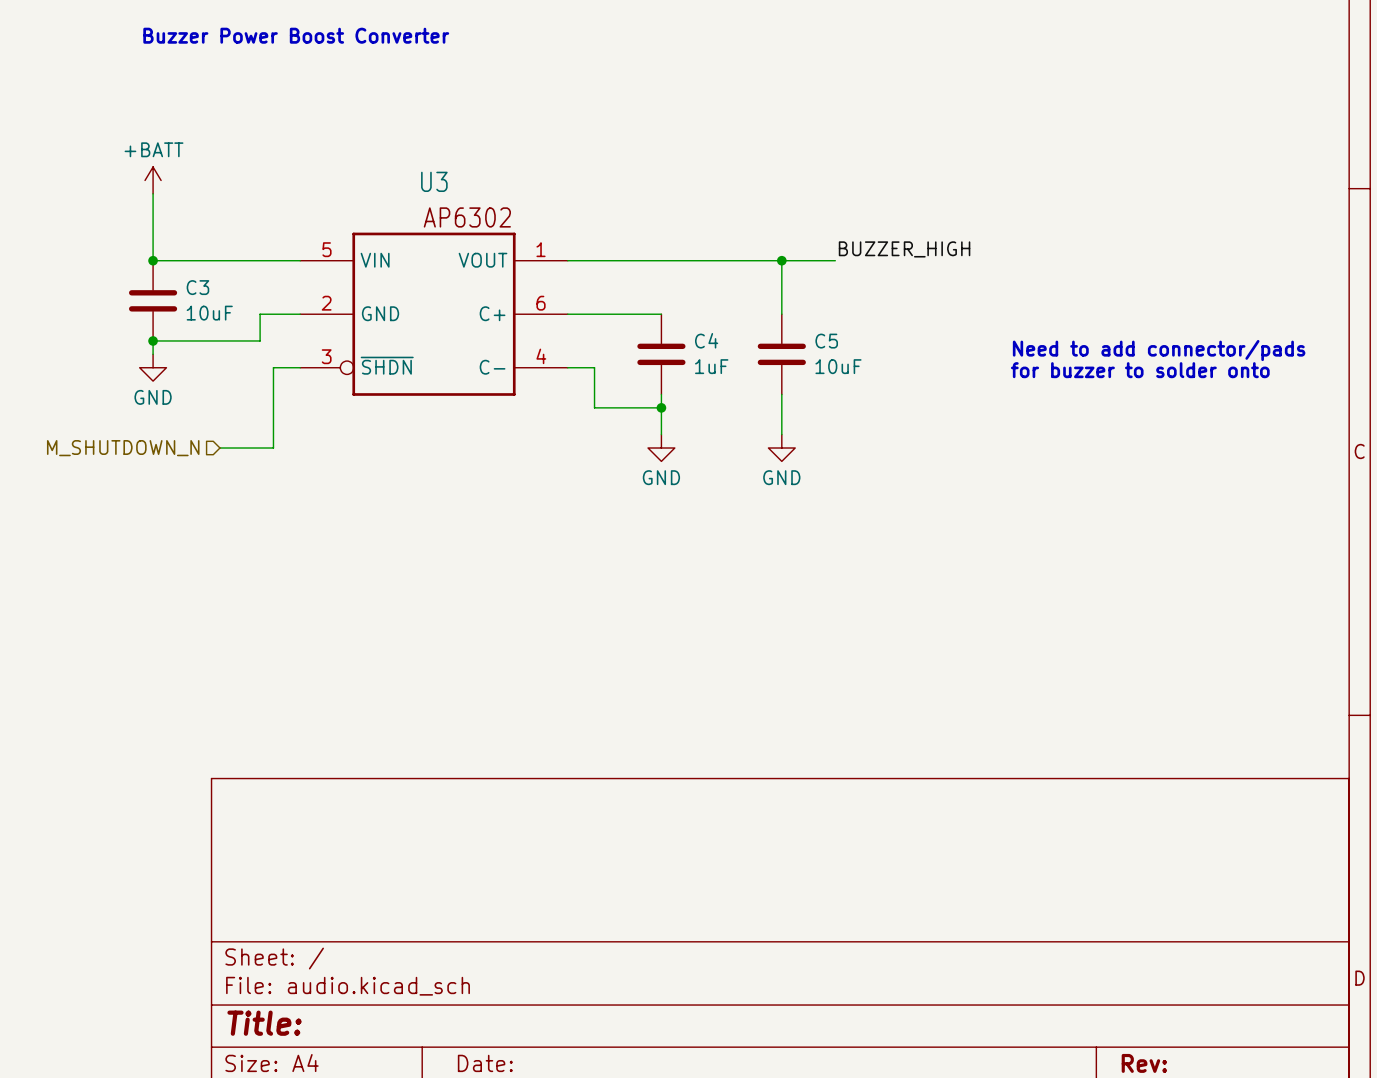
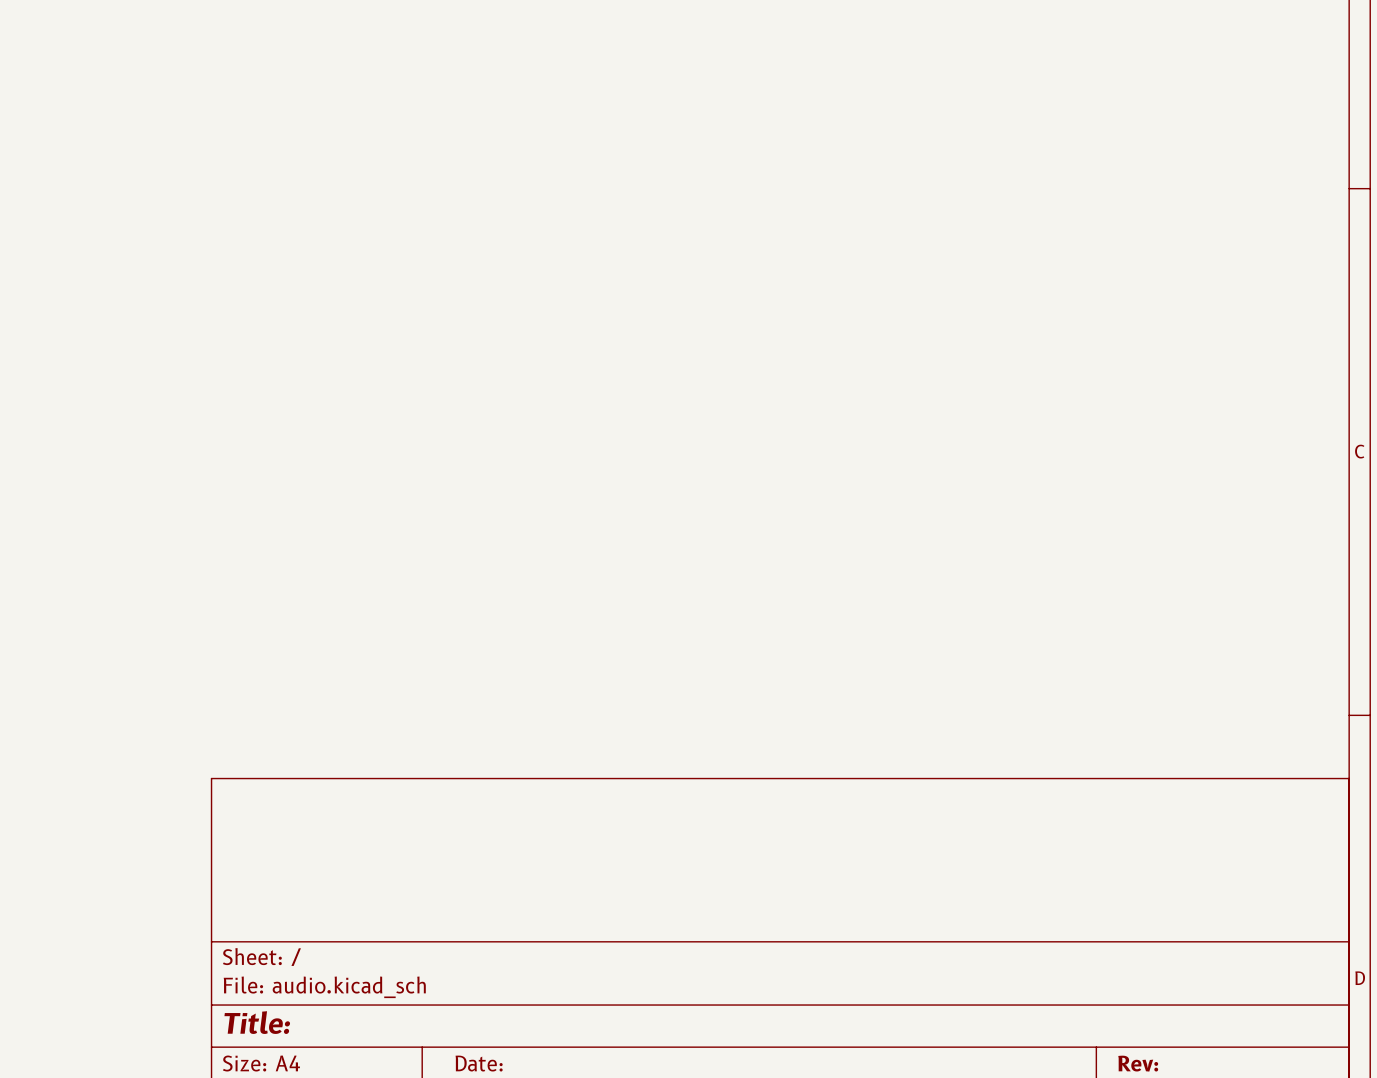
text: Buzzer Power Boost Converter (296, 35) -> none
power symbol: +BATT (153, 180) -> none
wire: (153, 193) (153, 260) (300, 260) -> none
label: BUZZER_HIGH (904, 249) -> none
junction: (153, 260) -> none
wire: (567, 260) (835, 260) -> none
wire: (781, 260) (781, 314) -> none
junction: (781, 260) -> none
C3: 10uF (153, 300) -> none
wire: (300, 314) (260, 314) (260, 340) (153, 340) (153, 354) -> none
U3: (434, 314) -> none
wire: (567, 314) (661, 314) -> none
junction: (153, 340) -> none
text: Need to add connector/pads (1159, 350) -> none
C4: 1uF (661, 354) -> none
C5: 10uF (781, 354) -> none
power symbol: GND (153, 367) -> none
wire: (300, 367) (273, 367) (273, 448) (219, 448) -> none
wire: (567, 367) (594, 367) (594, 407) (661, 407) -> none
text: for buzzer to solder onto (1140, 370) -> none
wire: (661, 394) (661, 434) -> none
wire: (781, 394) (781, 434) -> none
junction: (661, 407) -> none
hierarchical label: M_SHUTDOWN_N (123, 448) -> none
power symbol: GND (661, 448) -> none
power symbol: GND (781, 448) -> none

